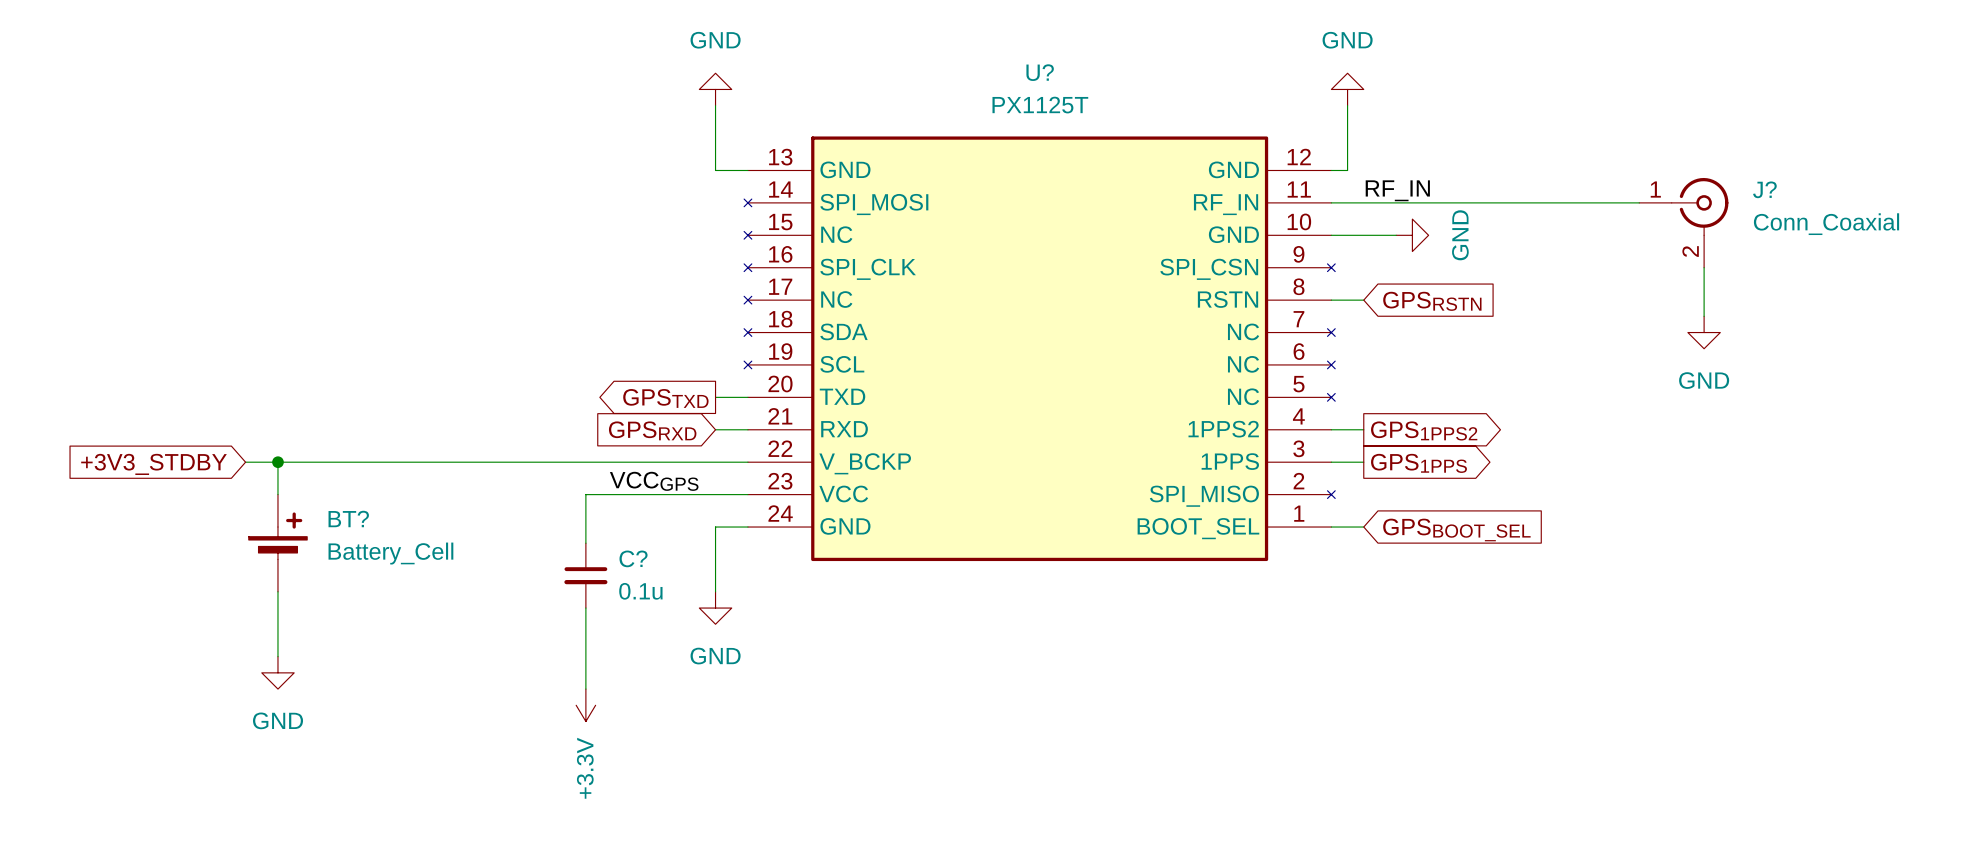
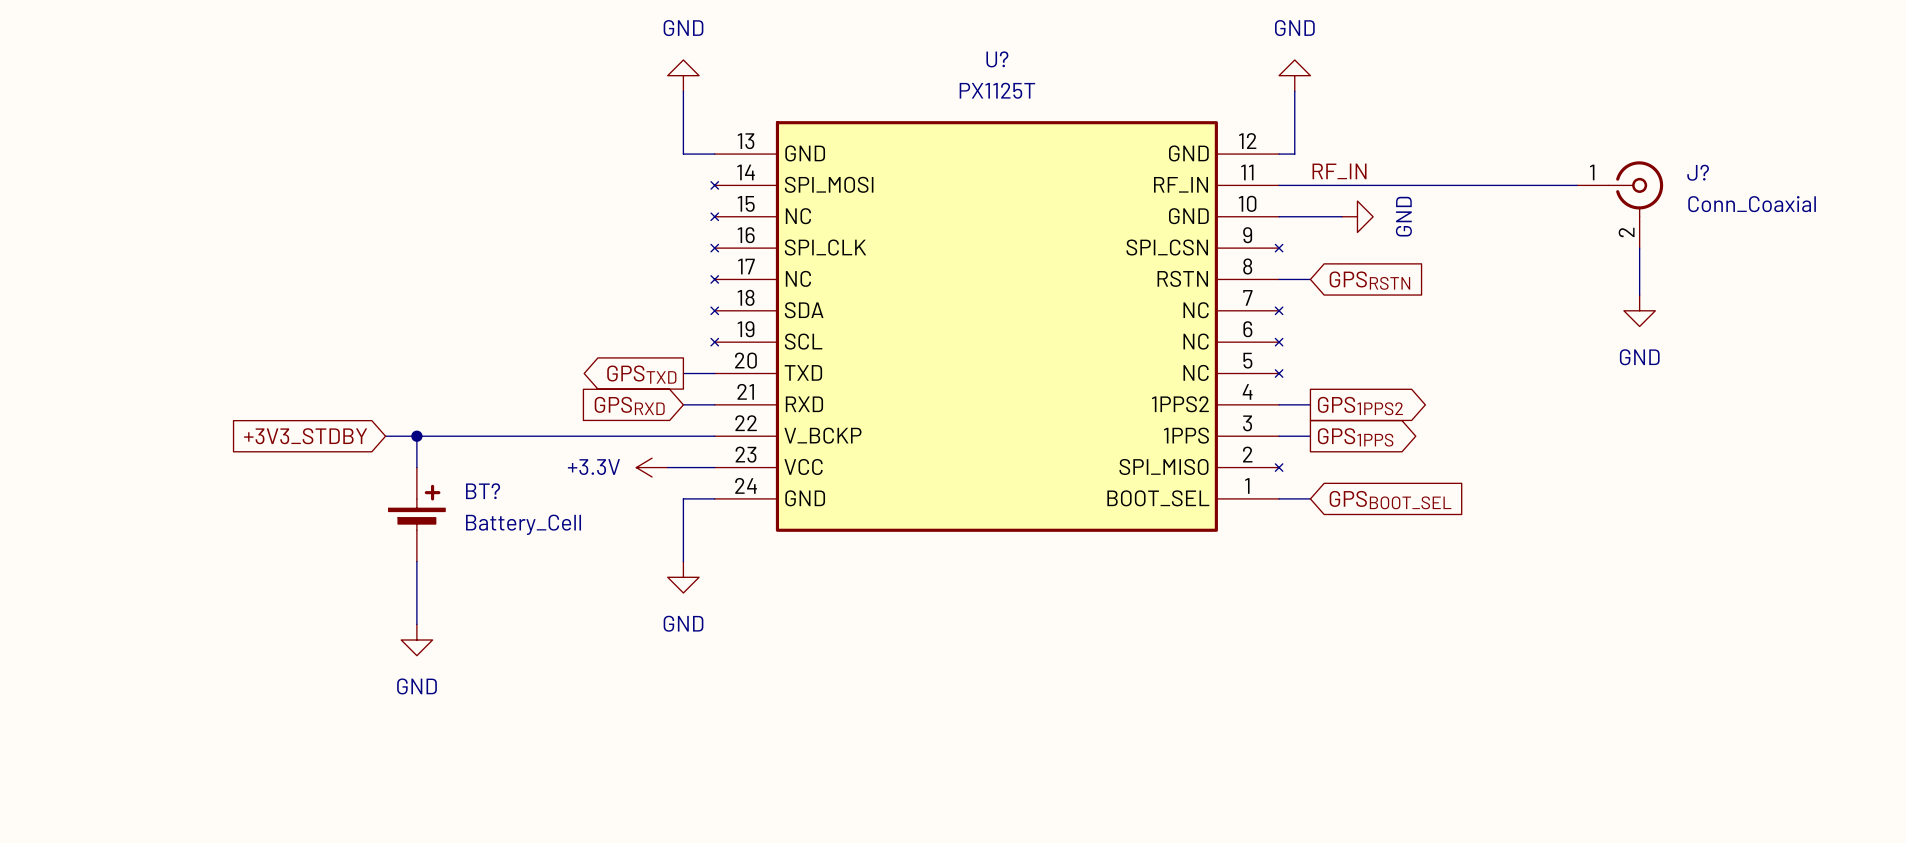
wire: (245, 462) (407, 462) -> none
wire: (277, 462) (277, 494) -> (416, 436) (416, 467)
junction: (277, 462) -> none
junction: none -> (416, 436)
global label position: +3V3_STDBY (154, 464) -> +3V3_STDBY (305, 436)
label: VCCGPS (654, 481) -> none
wire: (699, 494) (585, 494) (585, 543) -> none
BT? position: (277, 543) -> (416, 514)
C?: 0.1u (585, 575) -> none
wire: (277, 591) (277, 656) -> (416, 561) (416, 624)
wire: (585, 608) (585, 689) -> none
power symbol position: GND (277, 672) -> GND (416, 640)
power symbol rotation: 0° (585, 705) -> 90° clockwise (652, 467)
power symbol position: +3.3V (585, 705) -> +3.3V (652, 467)

